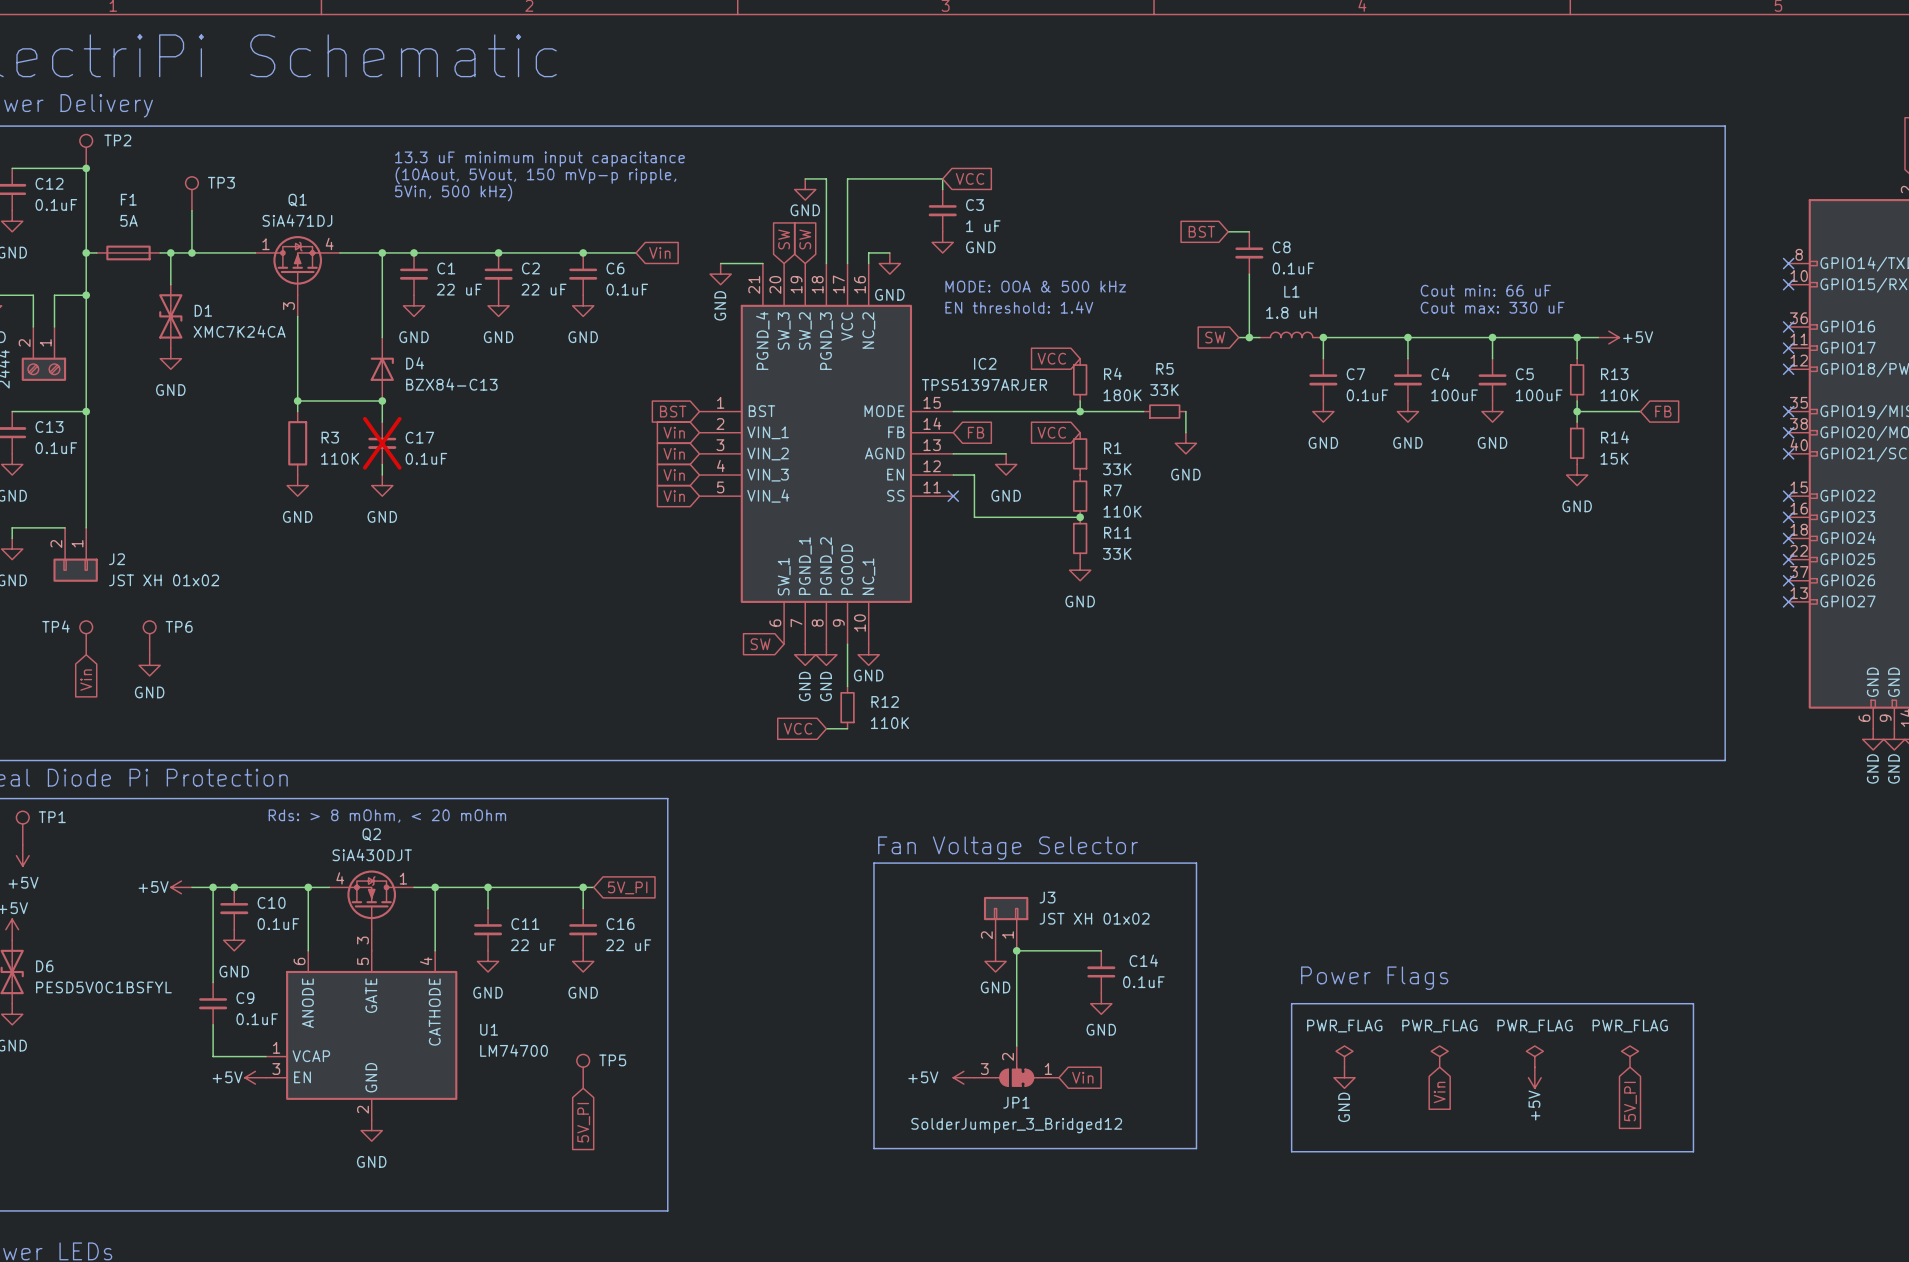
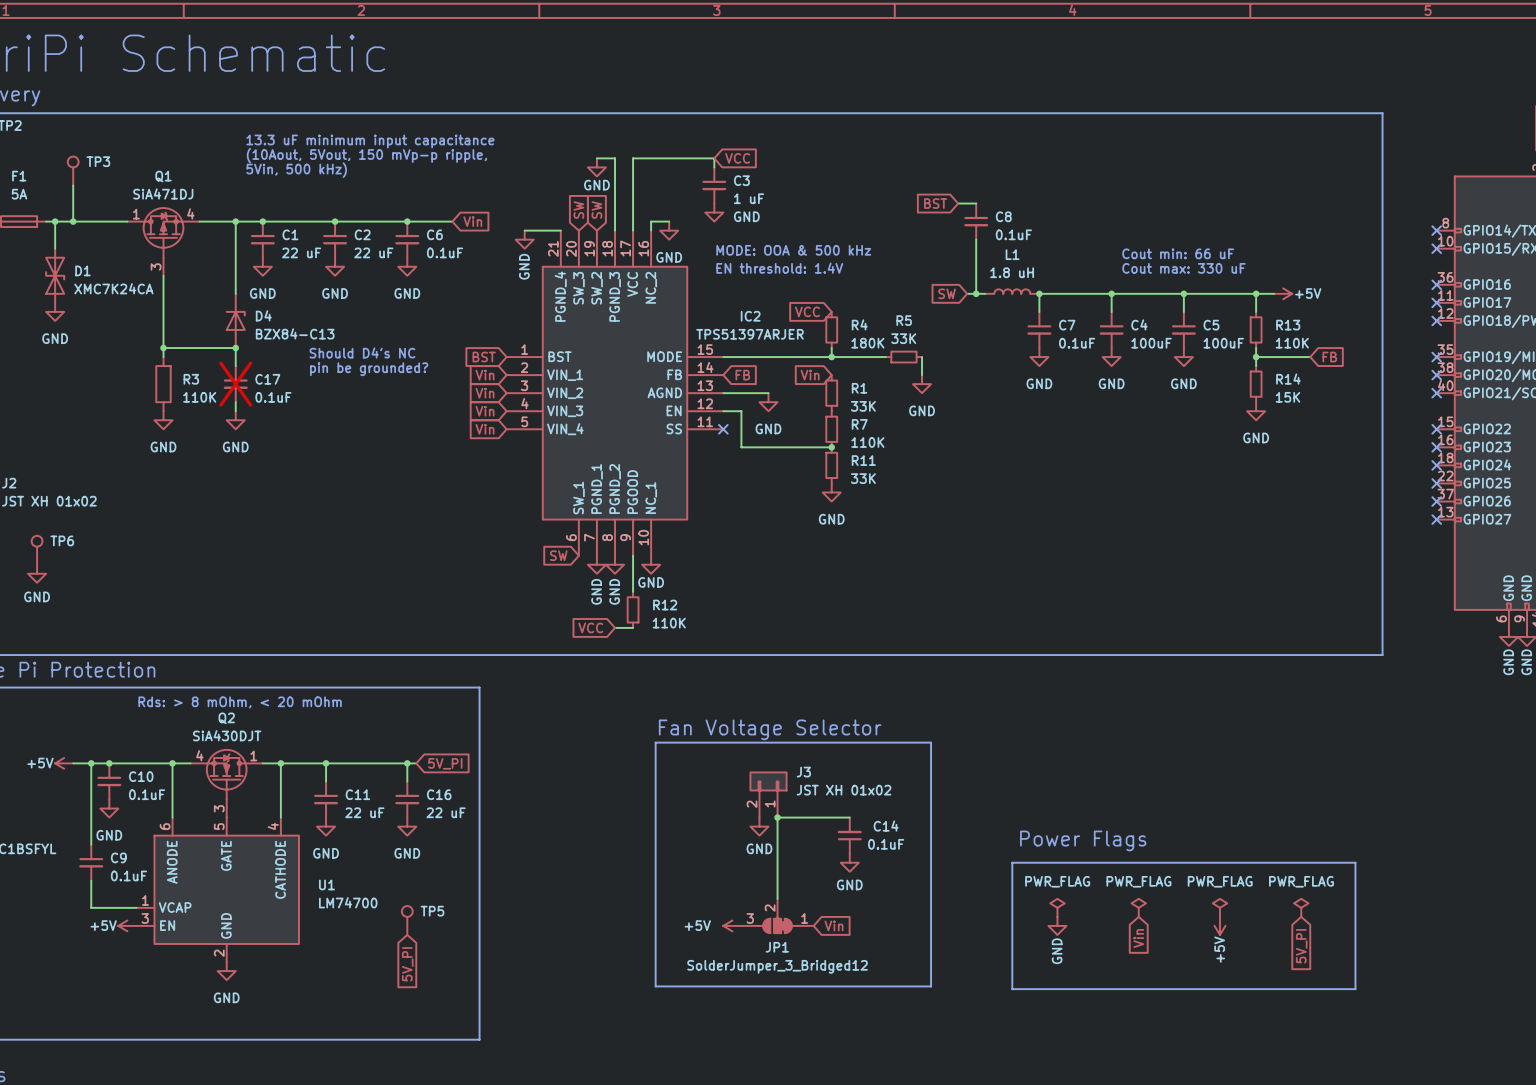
text: none -> Should D4's NC (362, 352)
text: none -> pin be grounded? (369, 369)
global label: VCC (1051, 432) -> Vin (810, 375)

